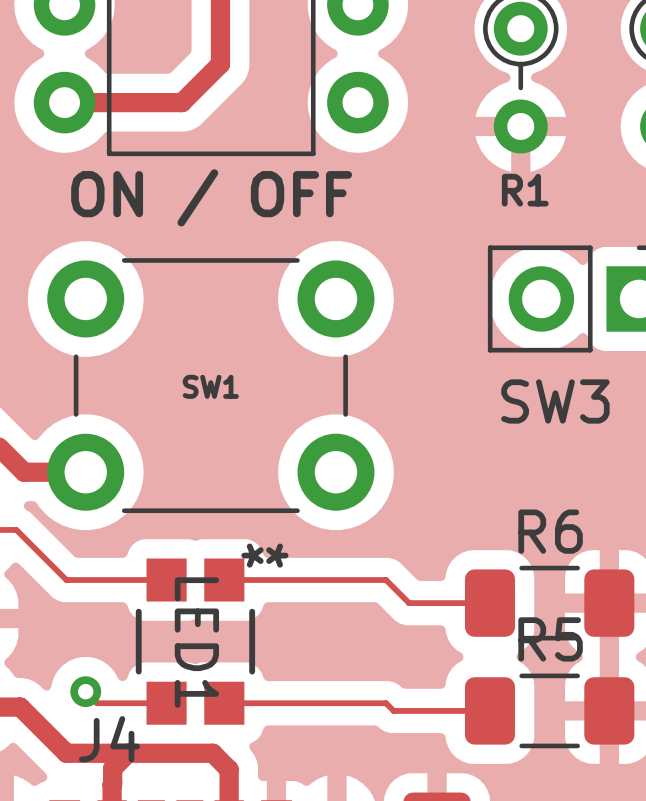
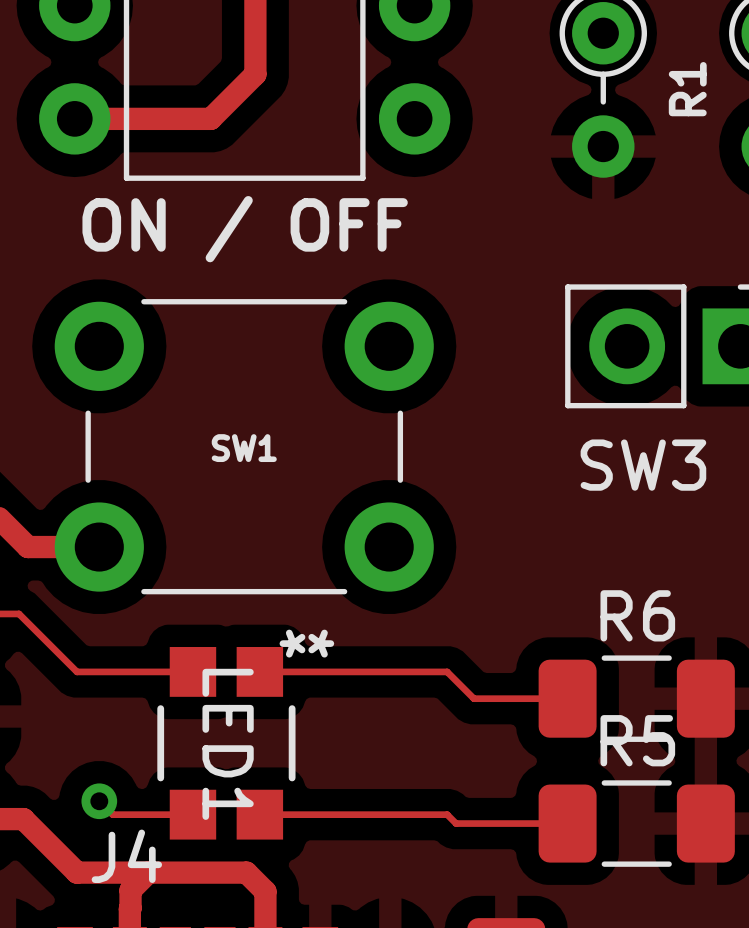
R1 name rotation: 0° (525, 190) -> 90° counterclockwise (687, 89)
R1 name position: R1 (525, 190) -> R1 (687, 89)

